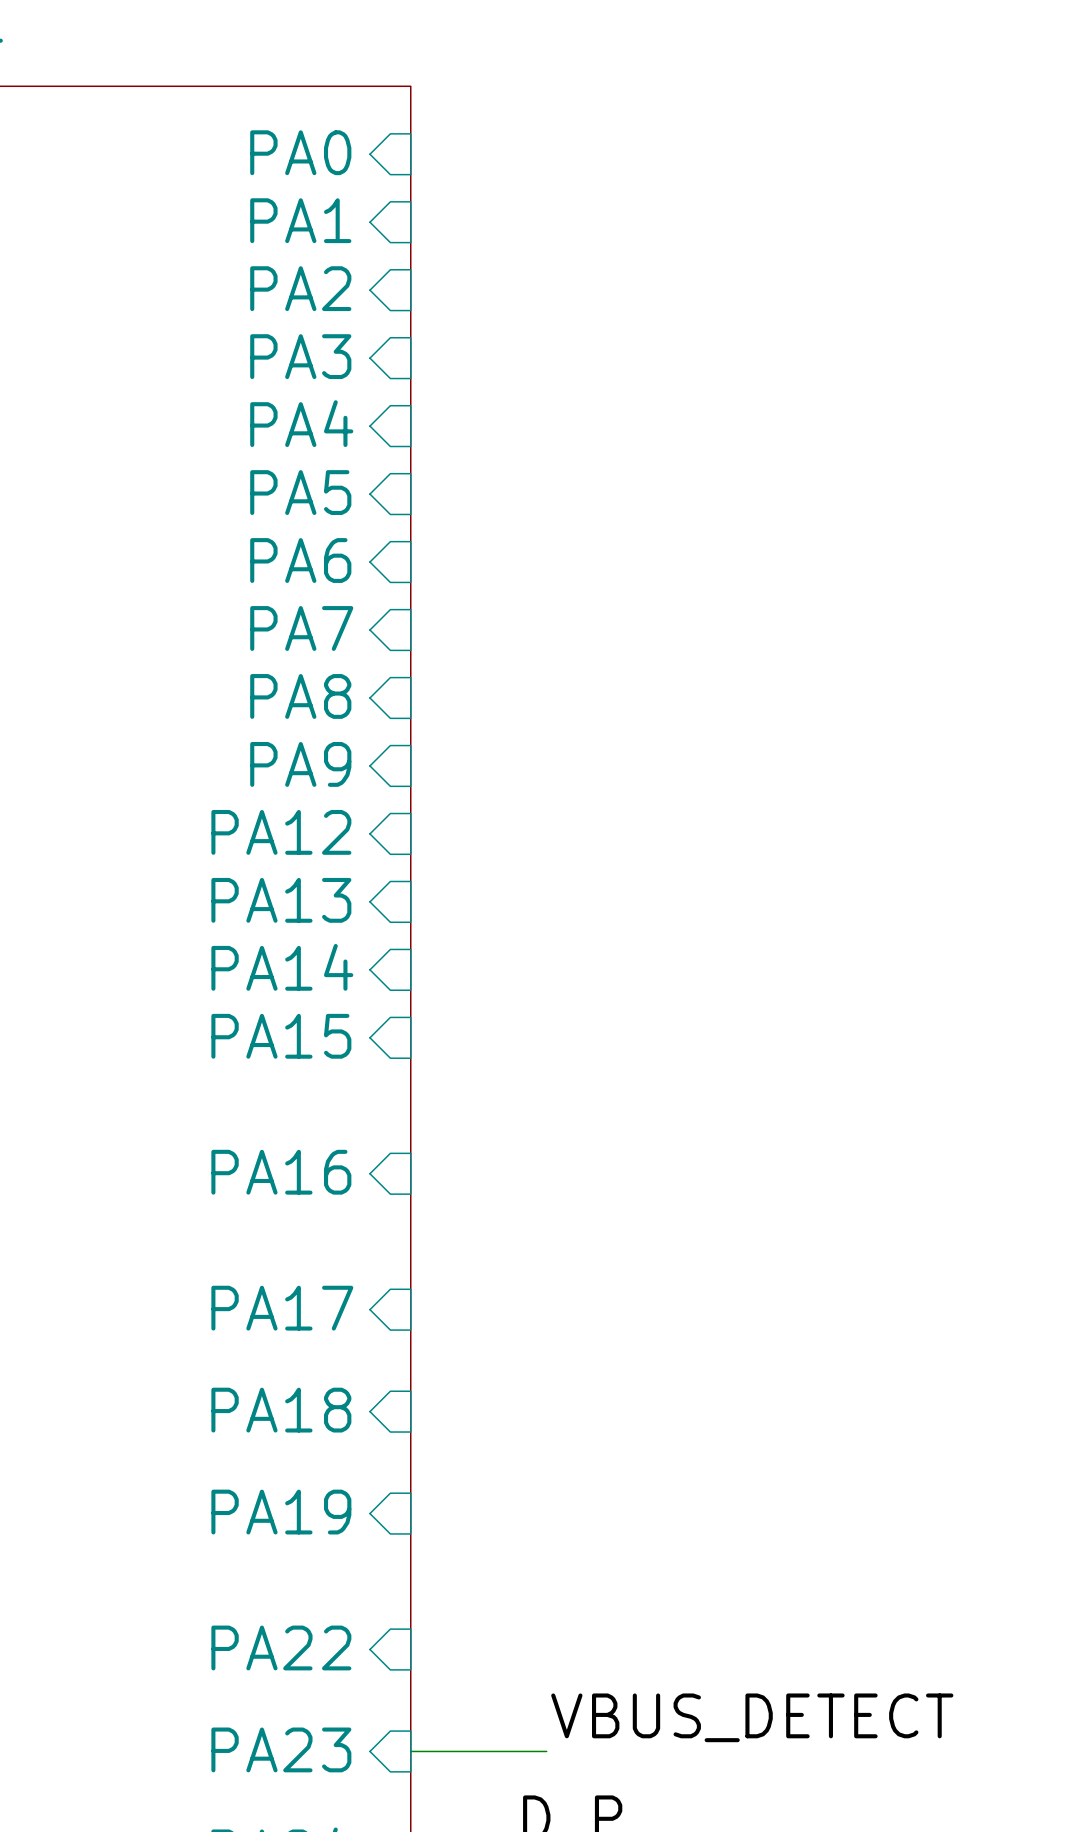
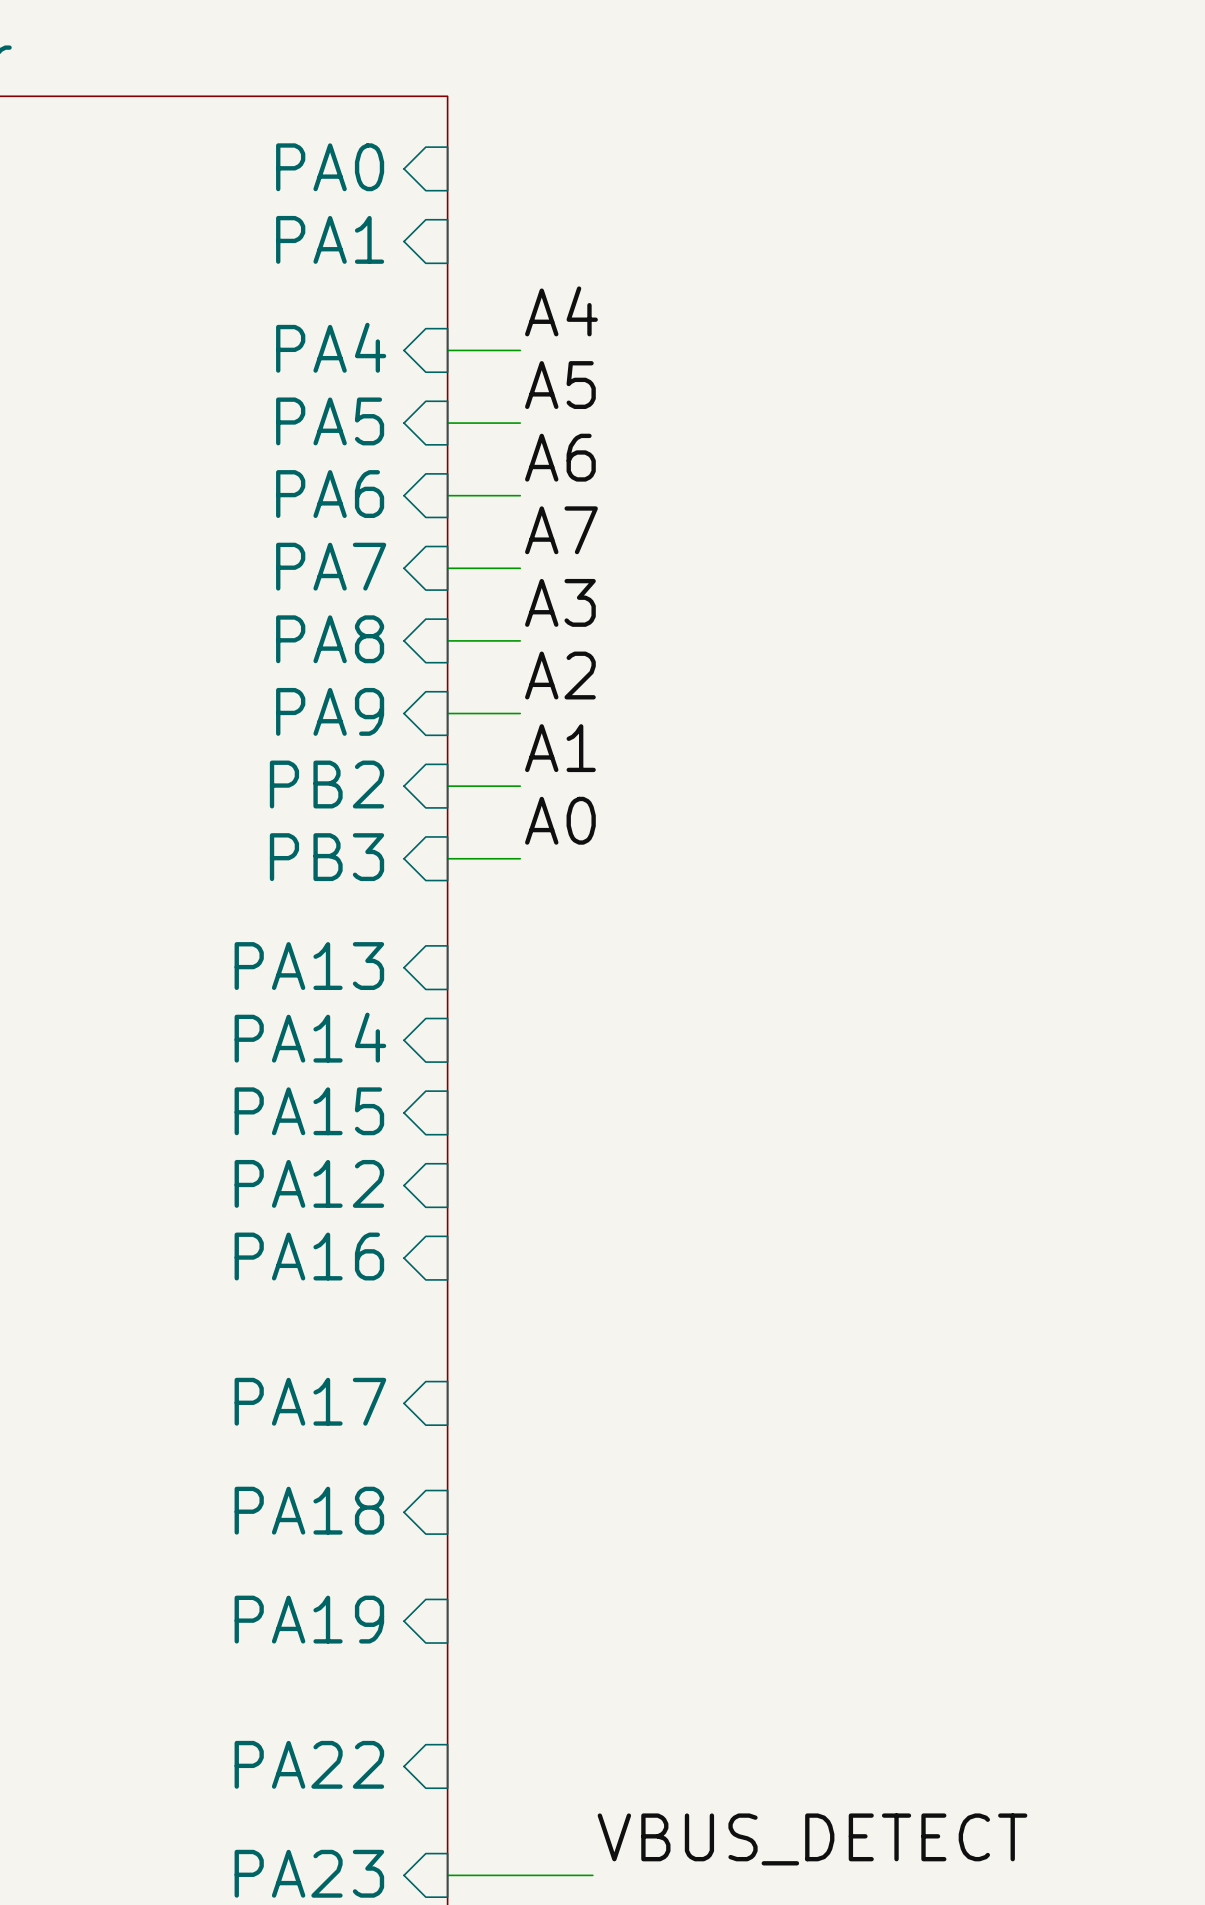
label: none -> A4 (561, 311)
sheet pin: PA2 (300, 288) -> none
wire: none -> (447, 350) (520, 350)
sheet pin: PA3 (300, 356) -> none
label: none -> A5 (560, 385)
wire: none -> (447, 423) (520, 423)
sheet pin position: PA4 (301, 423) -> PA4 (331, 347)
label: none -> A6 (560, 457)
wire: none -> (447, 495) (520, 495)
sheet pin position: PA5 (300, 492) -> PA5 (330, 421)
label: none -> A7 (561, 530)
wire: none -> (447, 568) (520, 568)
sheet pin position: PA6 (300, 560) -> PA6 (330, 494)
label: none -> A3 (560, 602)
wire: none -> (447, 640) (520, 640)
sheet pin position: PA7 (301, 628) -> PA7 (331, 566)
label: none -> A2 (560, 675)
wire: none -> (447, 713) (520, 713)
sheet pin position: PA8 (300, 696) -> PA8 (330, 639)
label: none -> A1 (560, 748)
sheet pin: none -> PB2 (326, 784)
wire: none -> (447, 786) (520, 786)
sheet pin position: PA9 (300, 764) -> PA9 (330, 711)
label: none -> A0 (560, 820)
sheet pin: none -> PB3 (326, 857)
wire: none -> (447, 858) (520, 858)
sheet pin position: PA12 (281, 832) -> PA12 (309, 1183)

